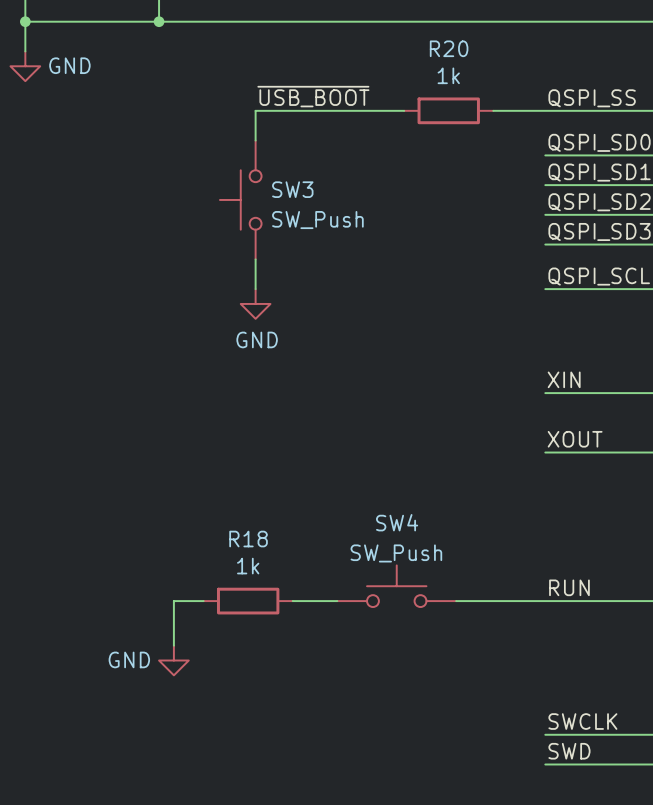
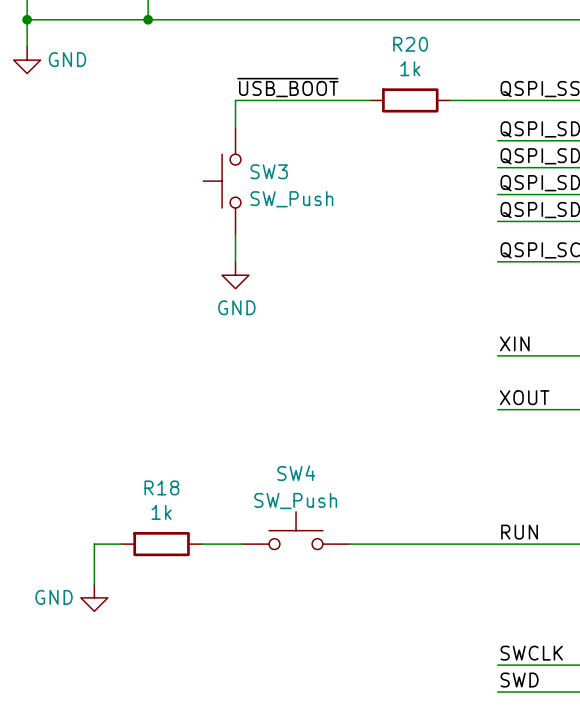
SW4 position: (396, 586) -> (296, 530)
wire: (203, 601) (173, 601) (173, 645) -> (121, 544) (94, 544) (94, 584)
R18 position: (248, 601) -> (161, 544)
wire: (292, 601) (337, 601) -> (201, 544) (242, 544)
wire: none -> (349, 544) (417, 544)
power symbol position: GND (173, 660) -> GND (94, 597)

